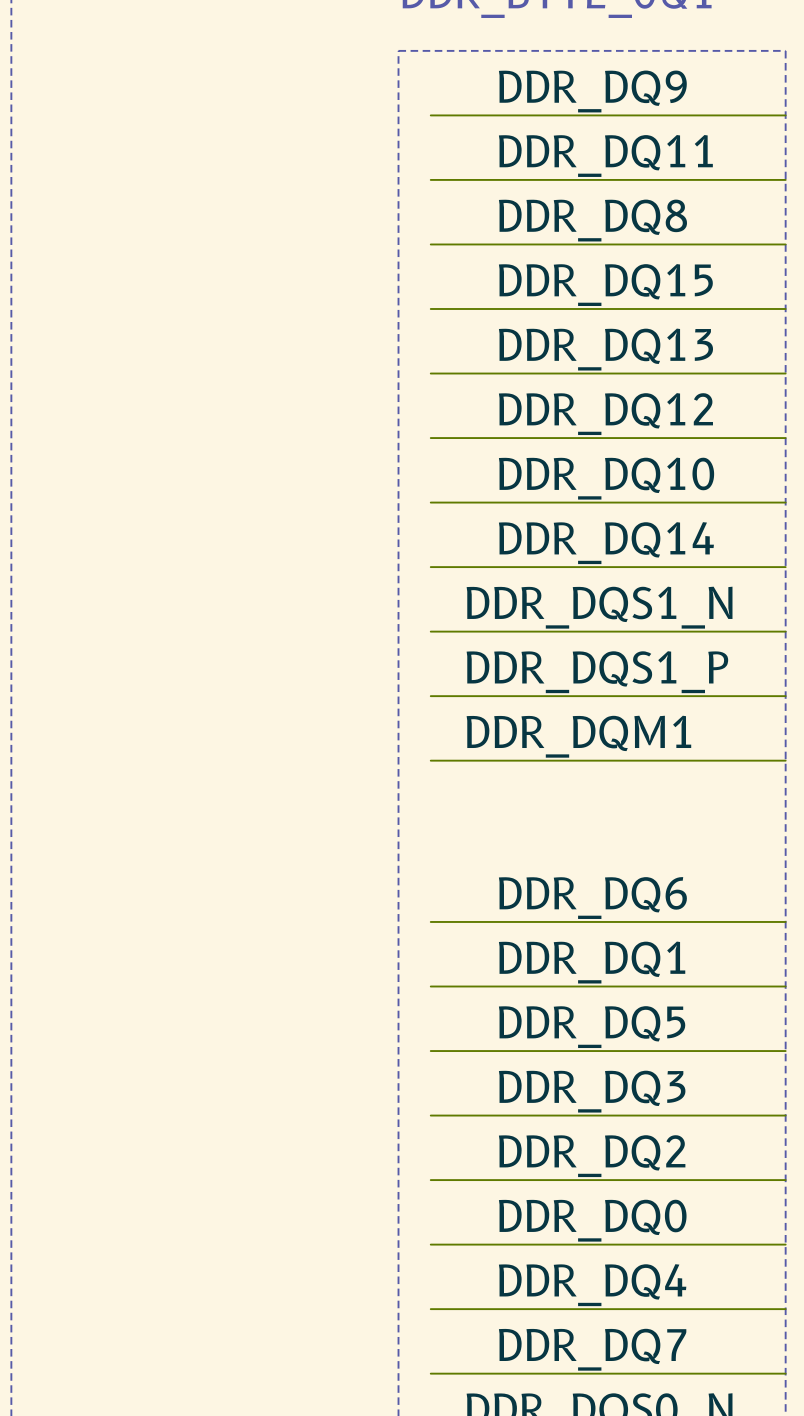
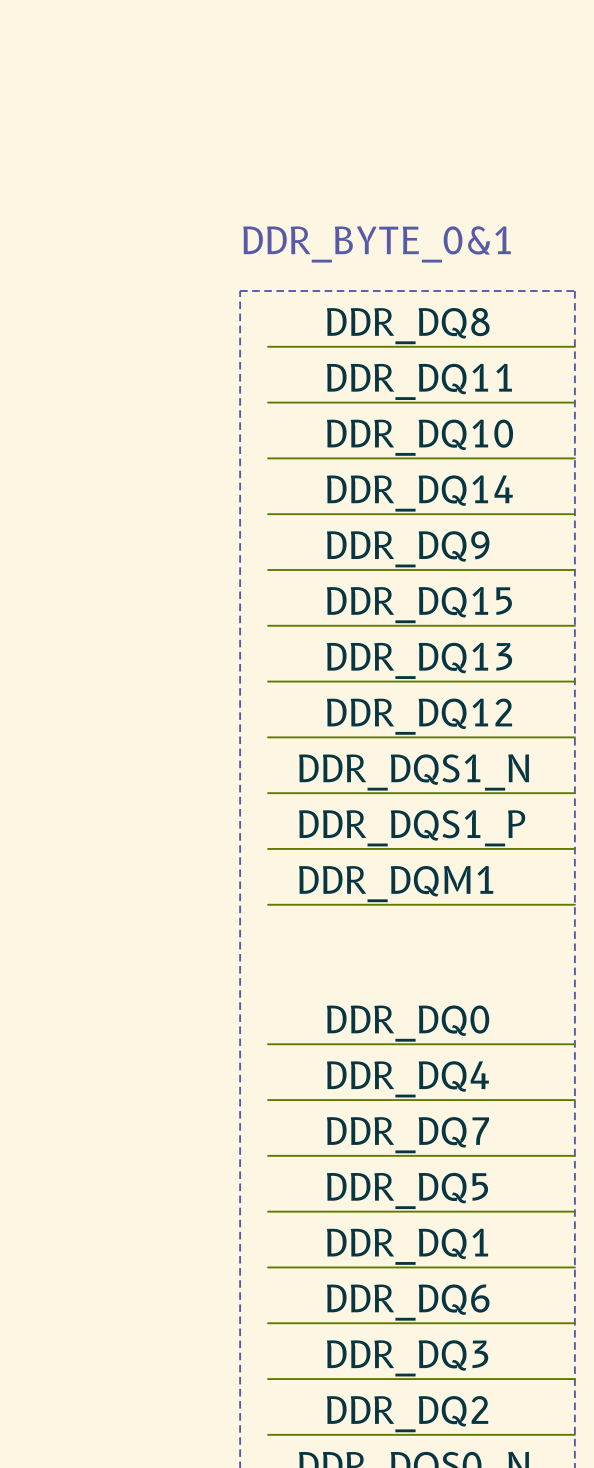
label: DDR_DQ9 (592, 91) -> DDR_DQ8 (408, 326)
label: DDR_DQ8 (592, 220) -> DDR_DQ10 (419, 437)
label: DDR_DQ15 (605, 285) -> DDR_DQ14 (419, 493)
label: DDR_DQ13 (605, 349) -> DDR_DQ9 (408, 549)
label: DDR_DQ12 (605, 414) -> DDR_DQ15 (419, 605)
label: DDR_DQ10 (606, 478) -> DDR_DQ13 (419, 660)
label: DDR_DQ14 (606, 543) -> DDR_DQ12 (419, 716)
label: DDR_DQ6 (592, 898) -> DDR_DQ0 (408, 1023)
label: DDR_DQ1 (592, 962) -> DDR_DQ4 (407, 1079)
label: DDR_DQ5 (592, 1027) -> DDR_DQ7 (407, 1135)
label: DDR_DQ3 (592, 1091) -> DDR_DQ5 (407, 1190)
label: DDR_DQ2 (592, 1156) -> DDR_DQ1 (407, 1246)
label: DDR_DQ0 (592, 1220) -> DDR_DQ6 (408, 1302)
label: DDR_DQ4 (592, 1285) -> DDR_DQ3 (407, 1358)
label: DDR_DQ7 (592, 1349) -> DDR_DQ2 (407, 1414)

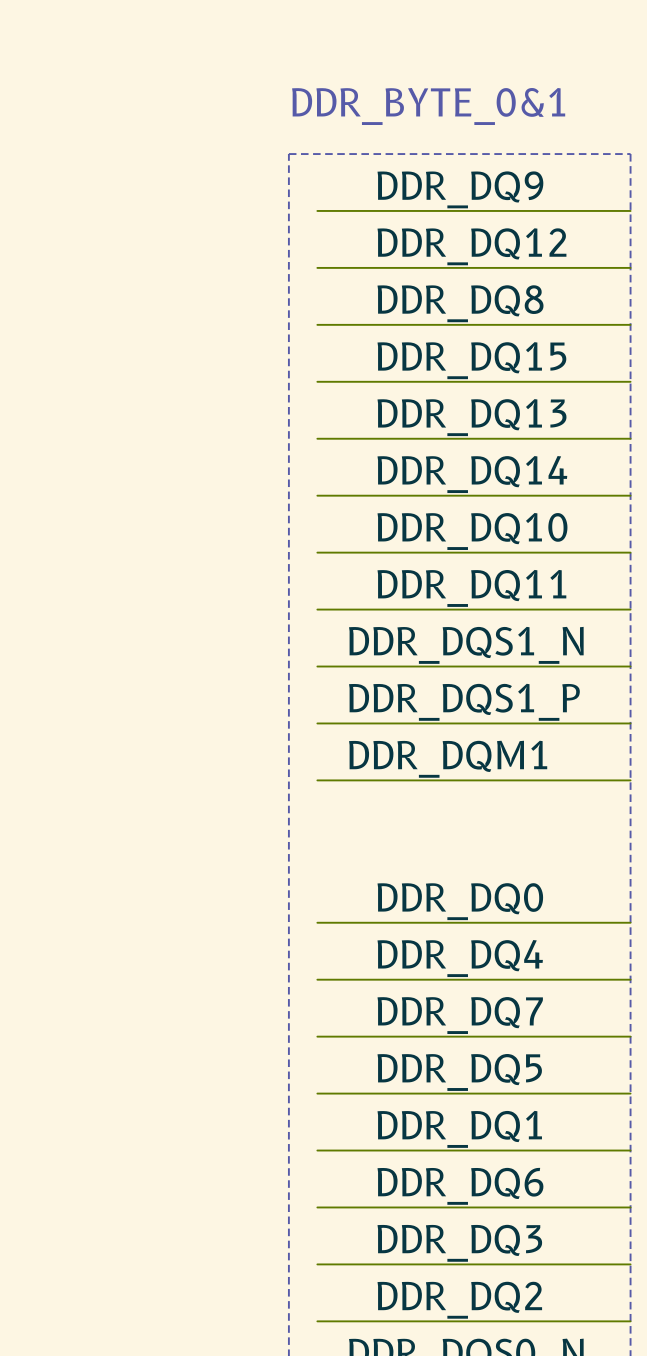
label: DDR_DQ8 (408, 326) -> DDR_DQ9 (460, 189)
label: DDR_DQ11 (419, 381) -> DDR_DQ12 (471, 246)
label: DDR_DQ10 (419, 437) -> DDR_DQ8 (460, 303)
label: DDR_DQ14 (419, 493) -> DDR_DQ15 (471, 360)
label: DDR_DQ9 (408, 549) -> DDR_DQ13 (471, 417)
label: DDR_DQ15 (419, 605) -> DDR_DQ14 (472, 474)
label: DDR_DQ13 (419, 660) -> DDR_DQ10 (472, 531)
label: DDR_DQ12 (419, 716) -> DDR_DQ11 (471, 588)

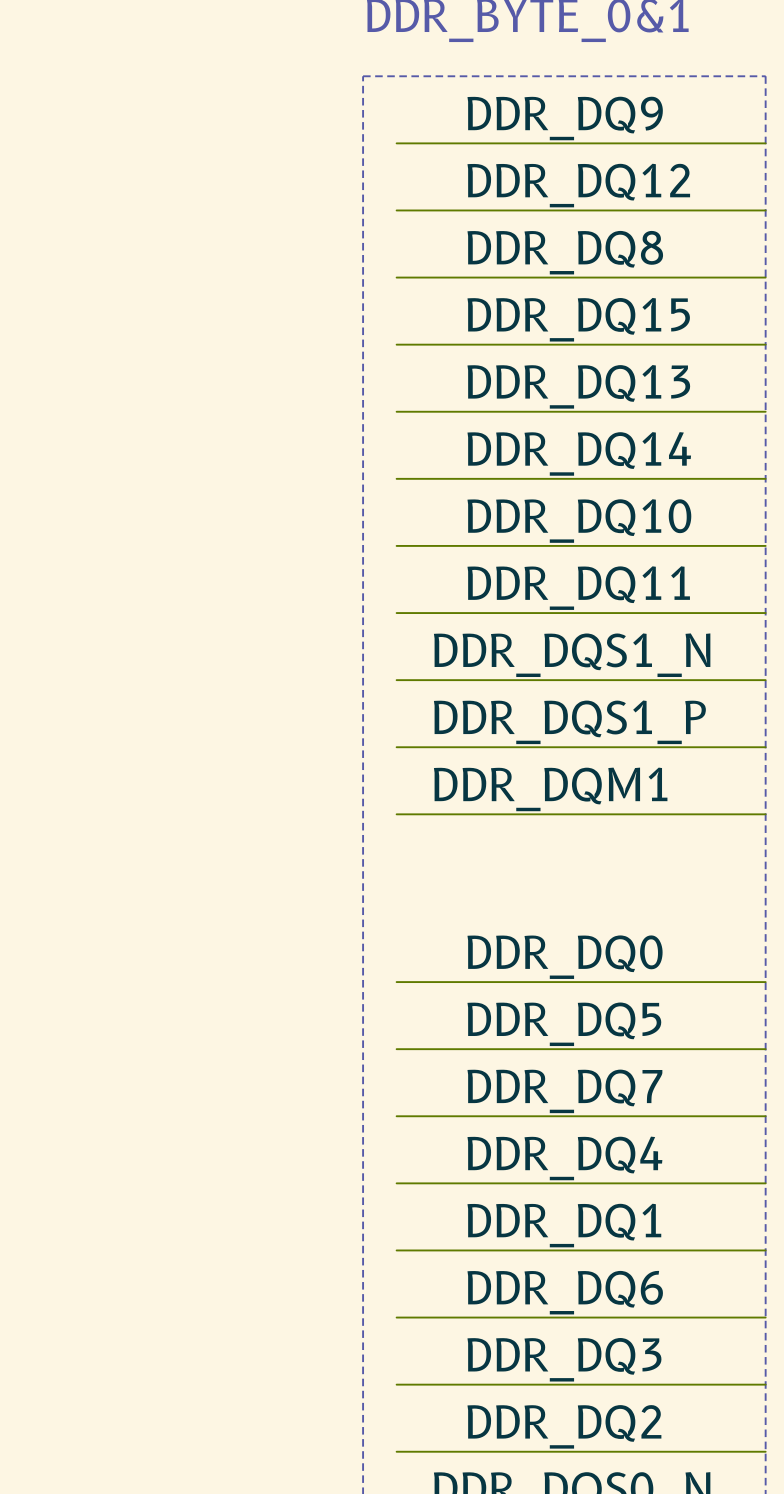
label: DDR_DQ4 (460, 958) -> DDR_DQ5 (564, 1024)
label: DDR_DQ5 (459, 1072) -> DDR_DQ4 (564, 1158)

